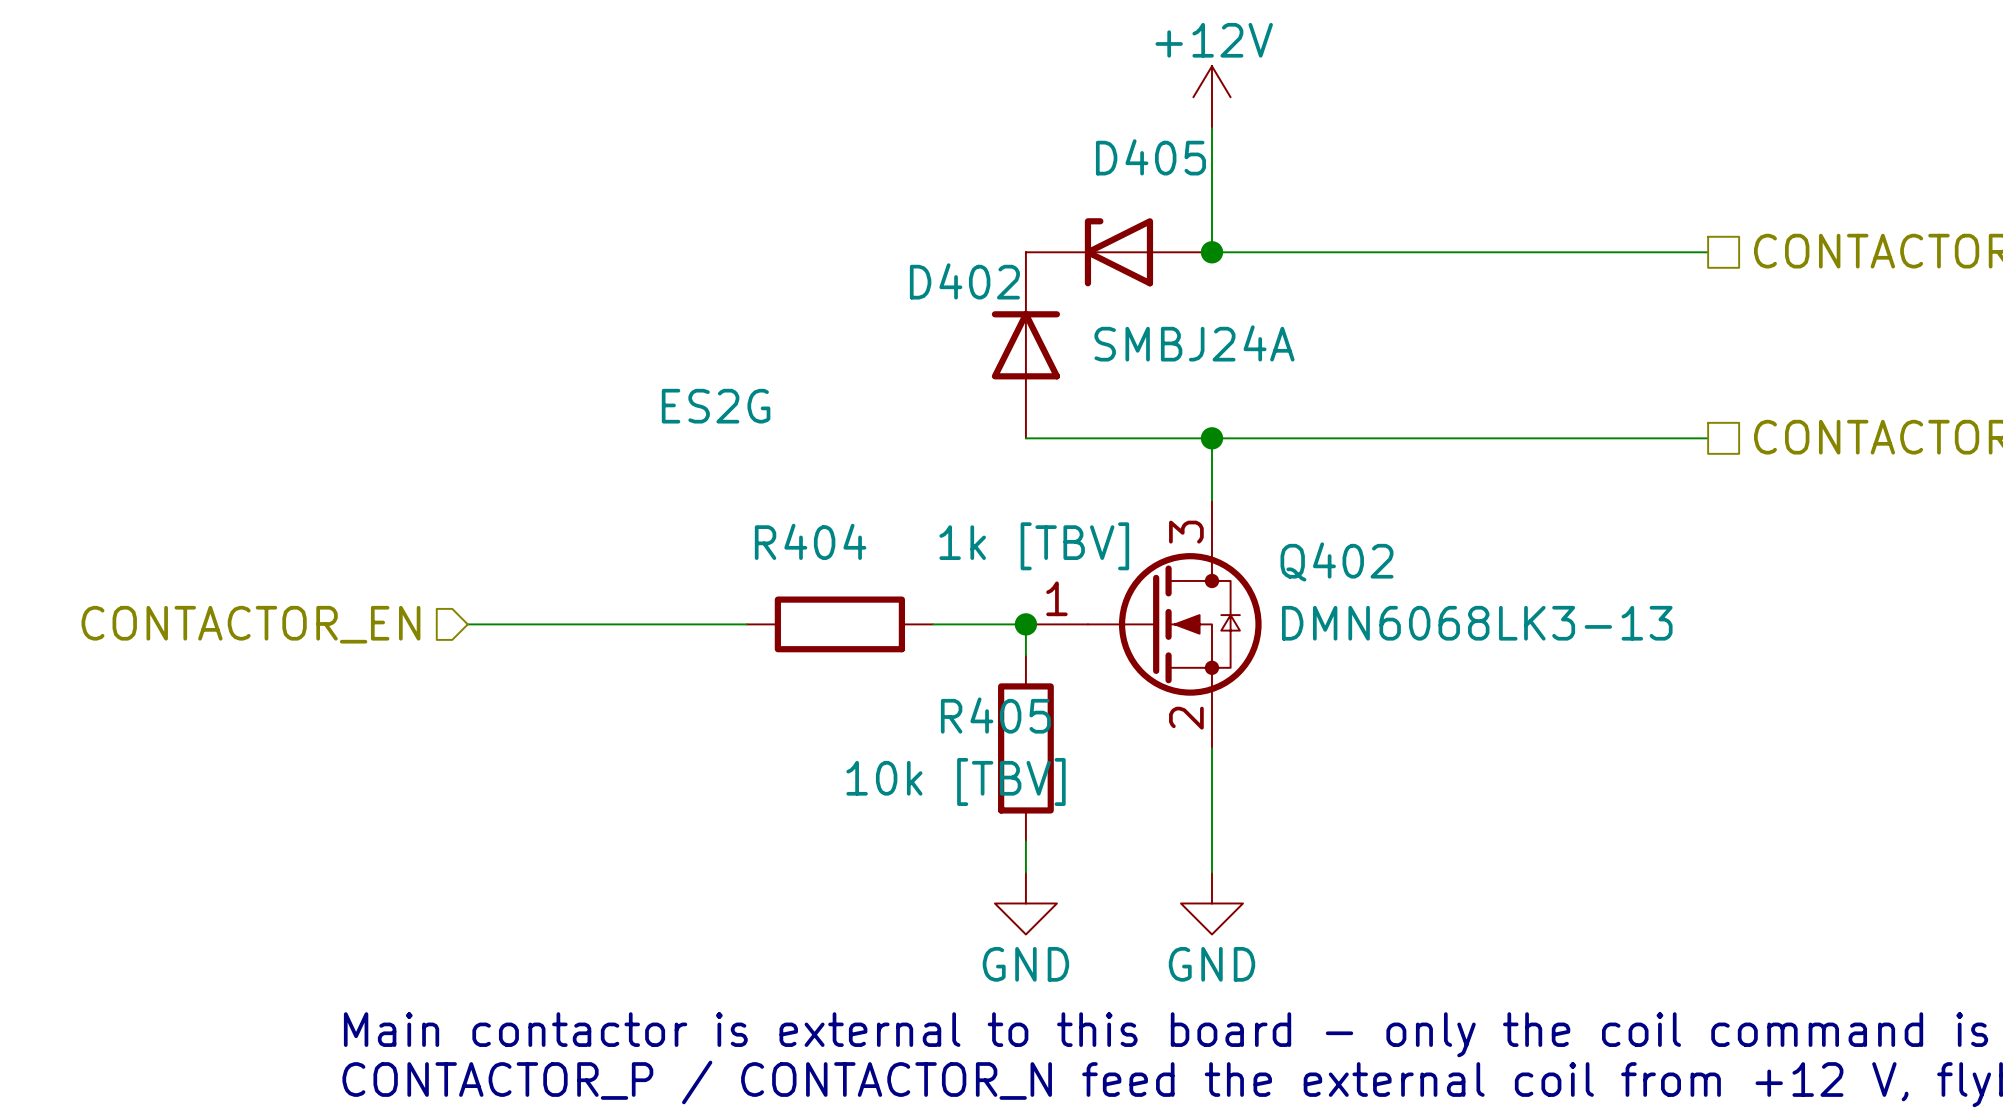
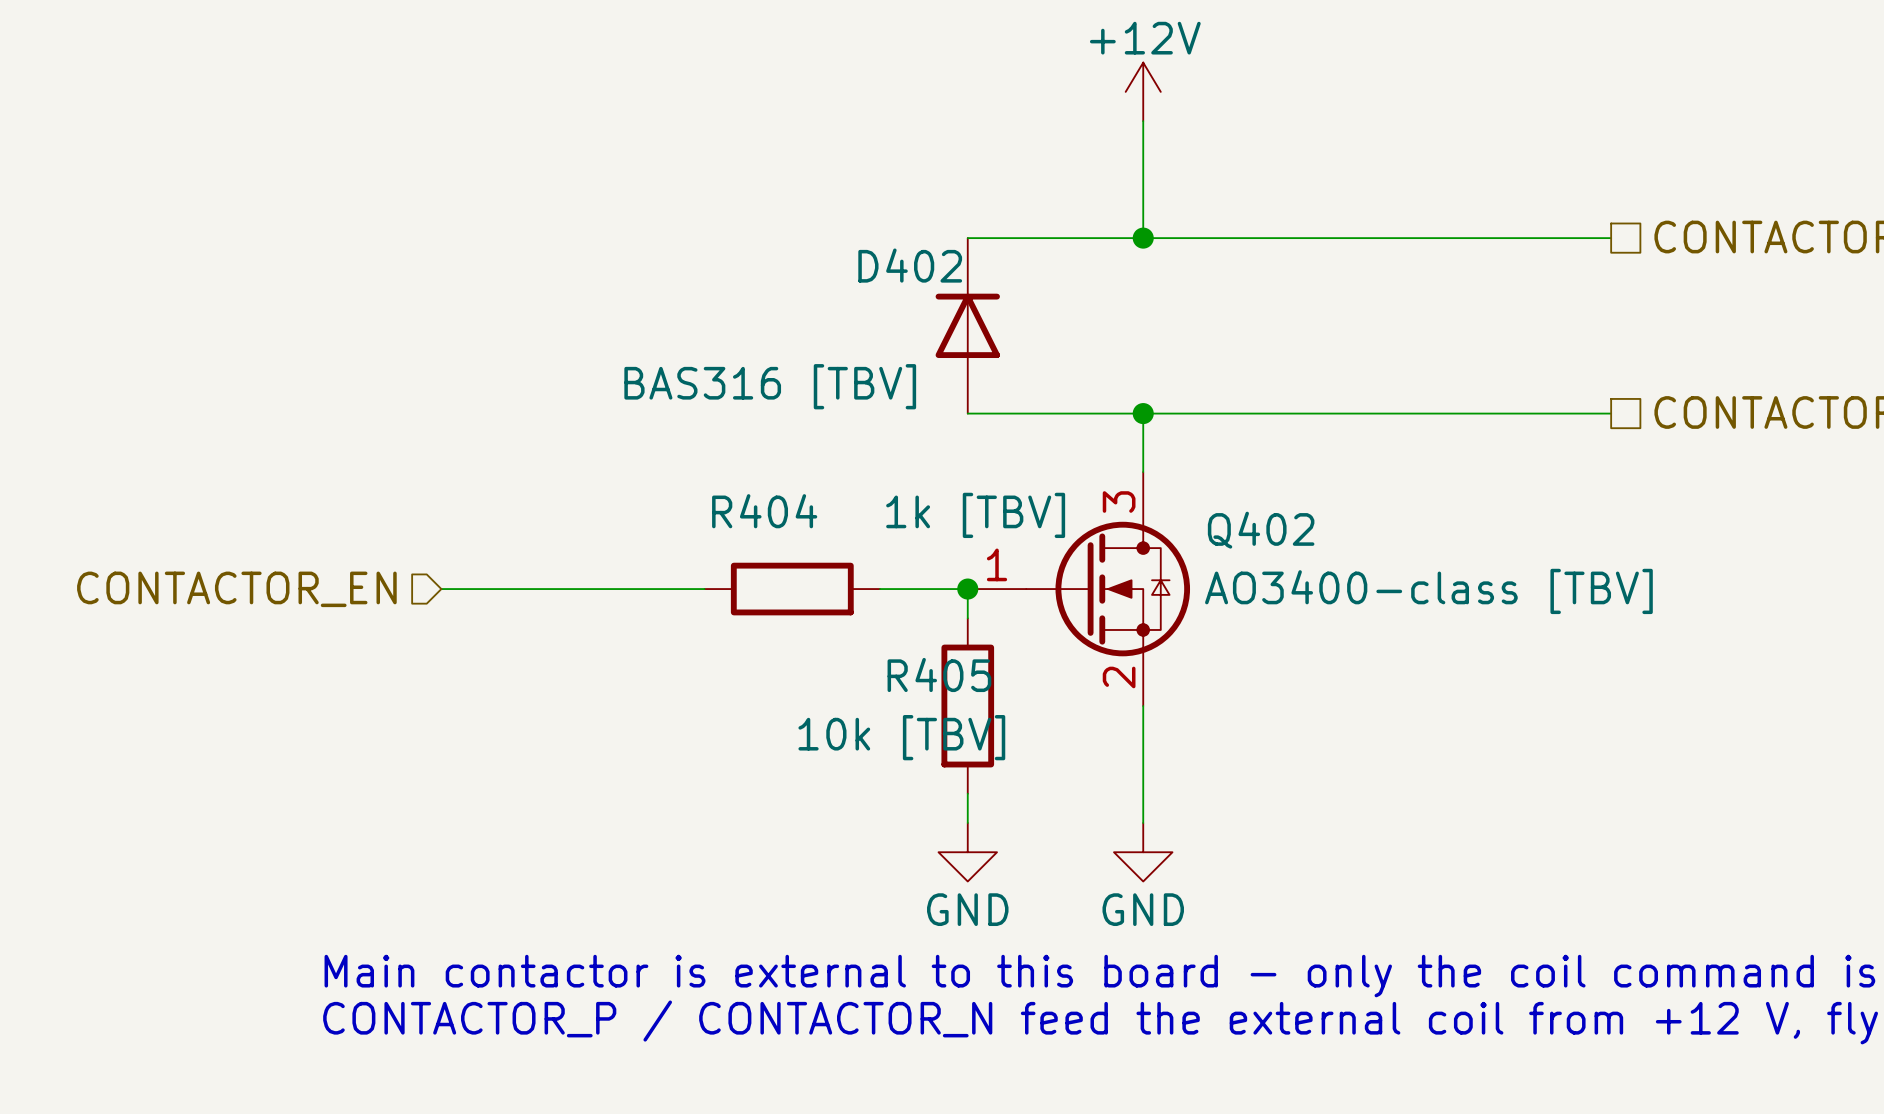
D405: SMBJ24A (1118, 252) -> none
D402 value: ES2G (716, 406) -> BAS316 [TBV] (770, 386)
Q402 value: DMN6068LK3-13 (1477, 623) -> AO3400-class [TBV] (1428, 591)

